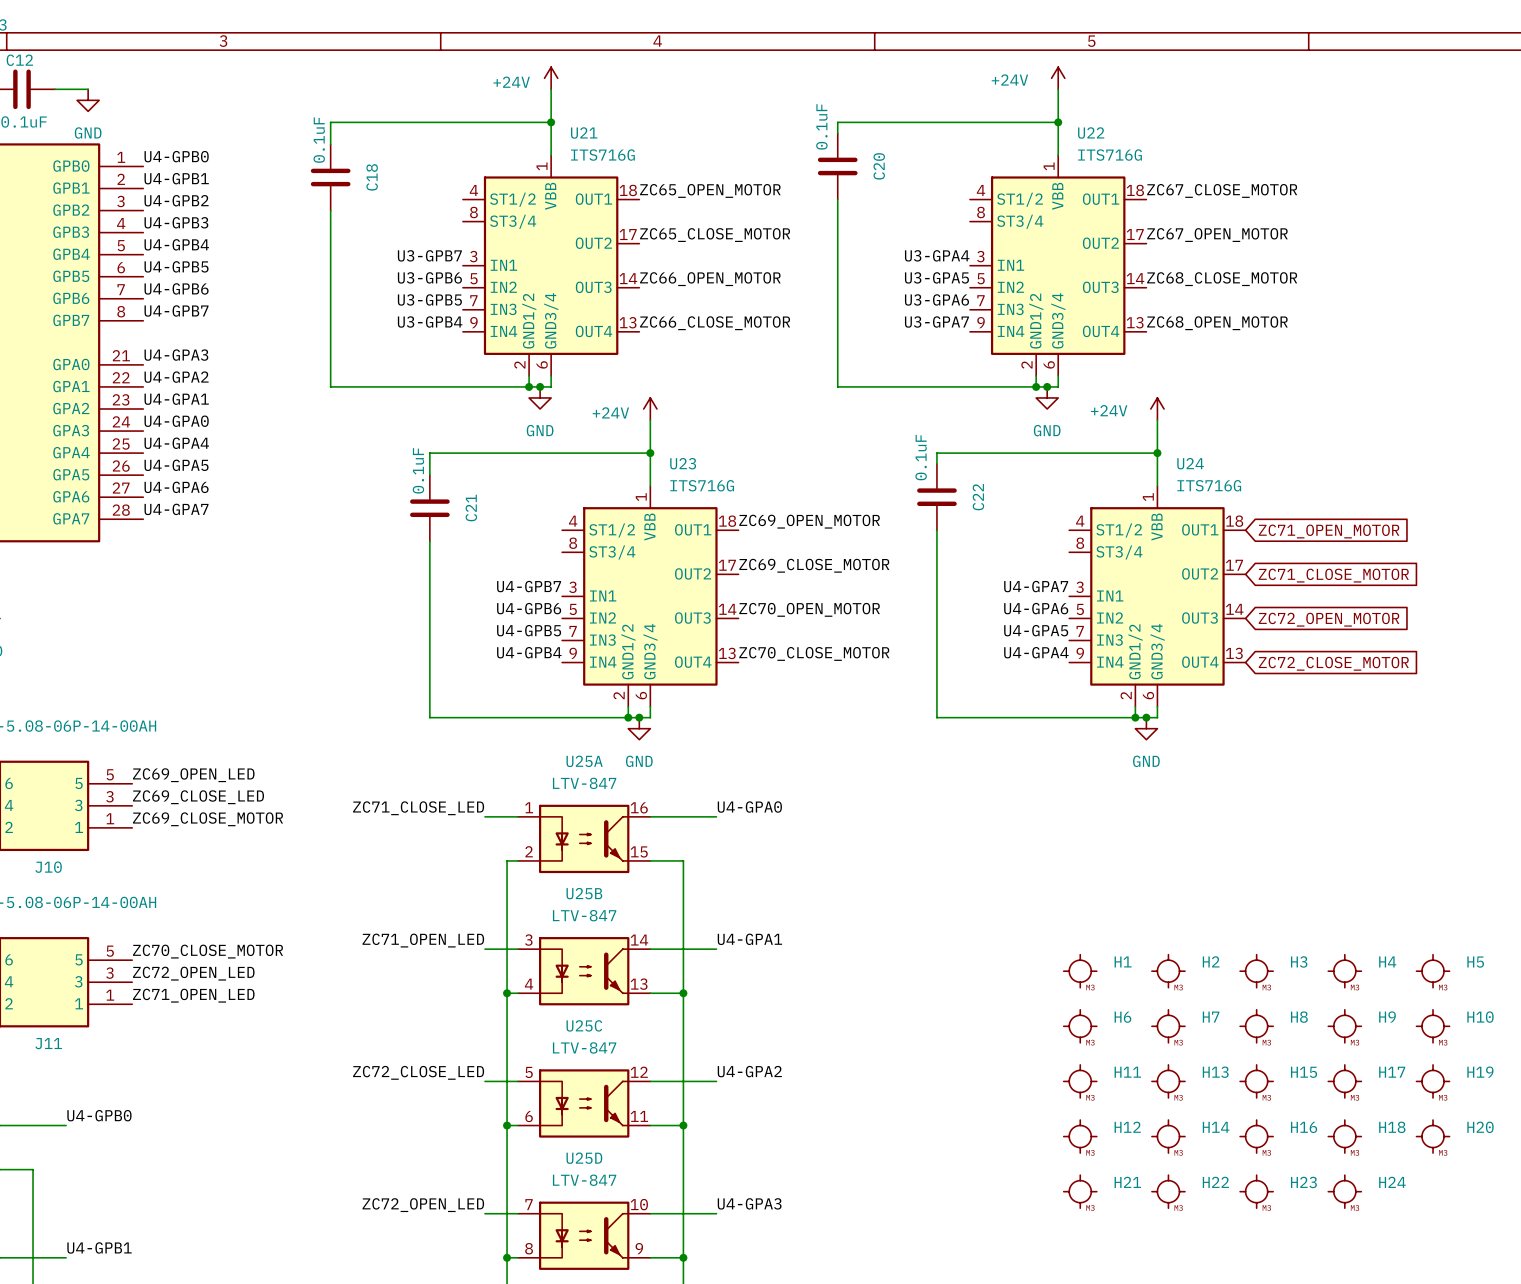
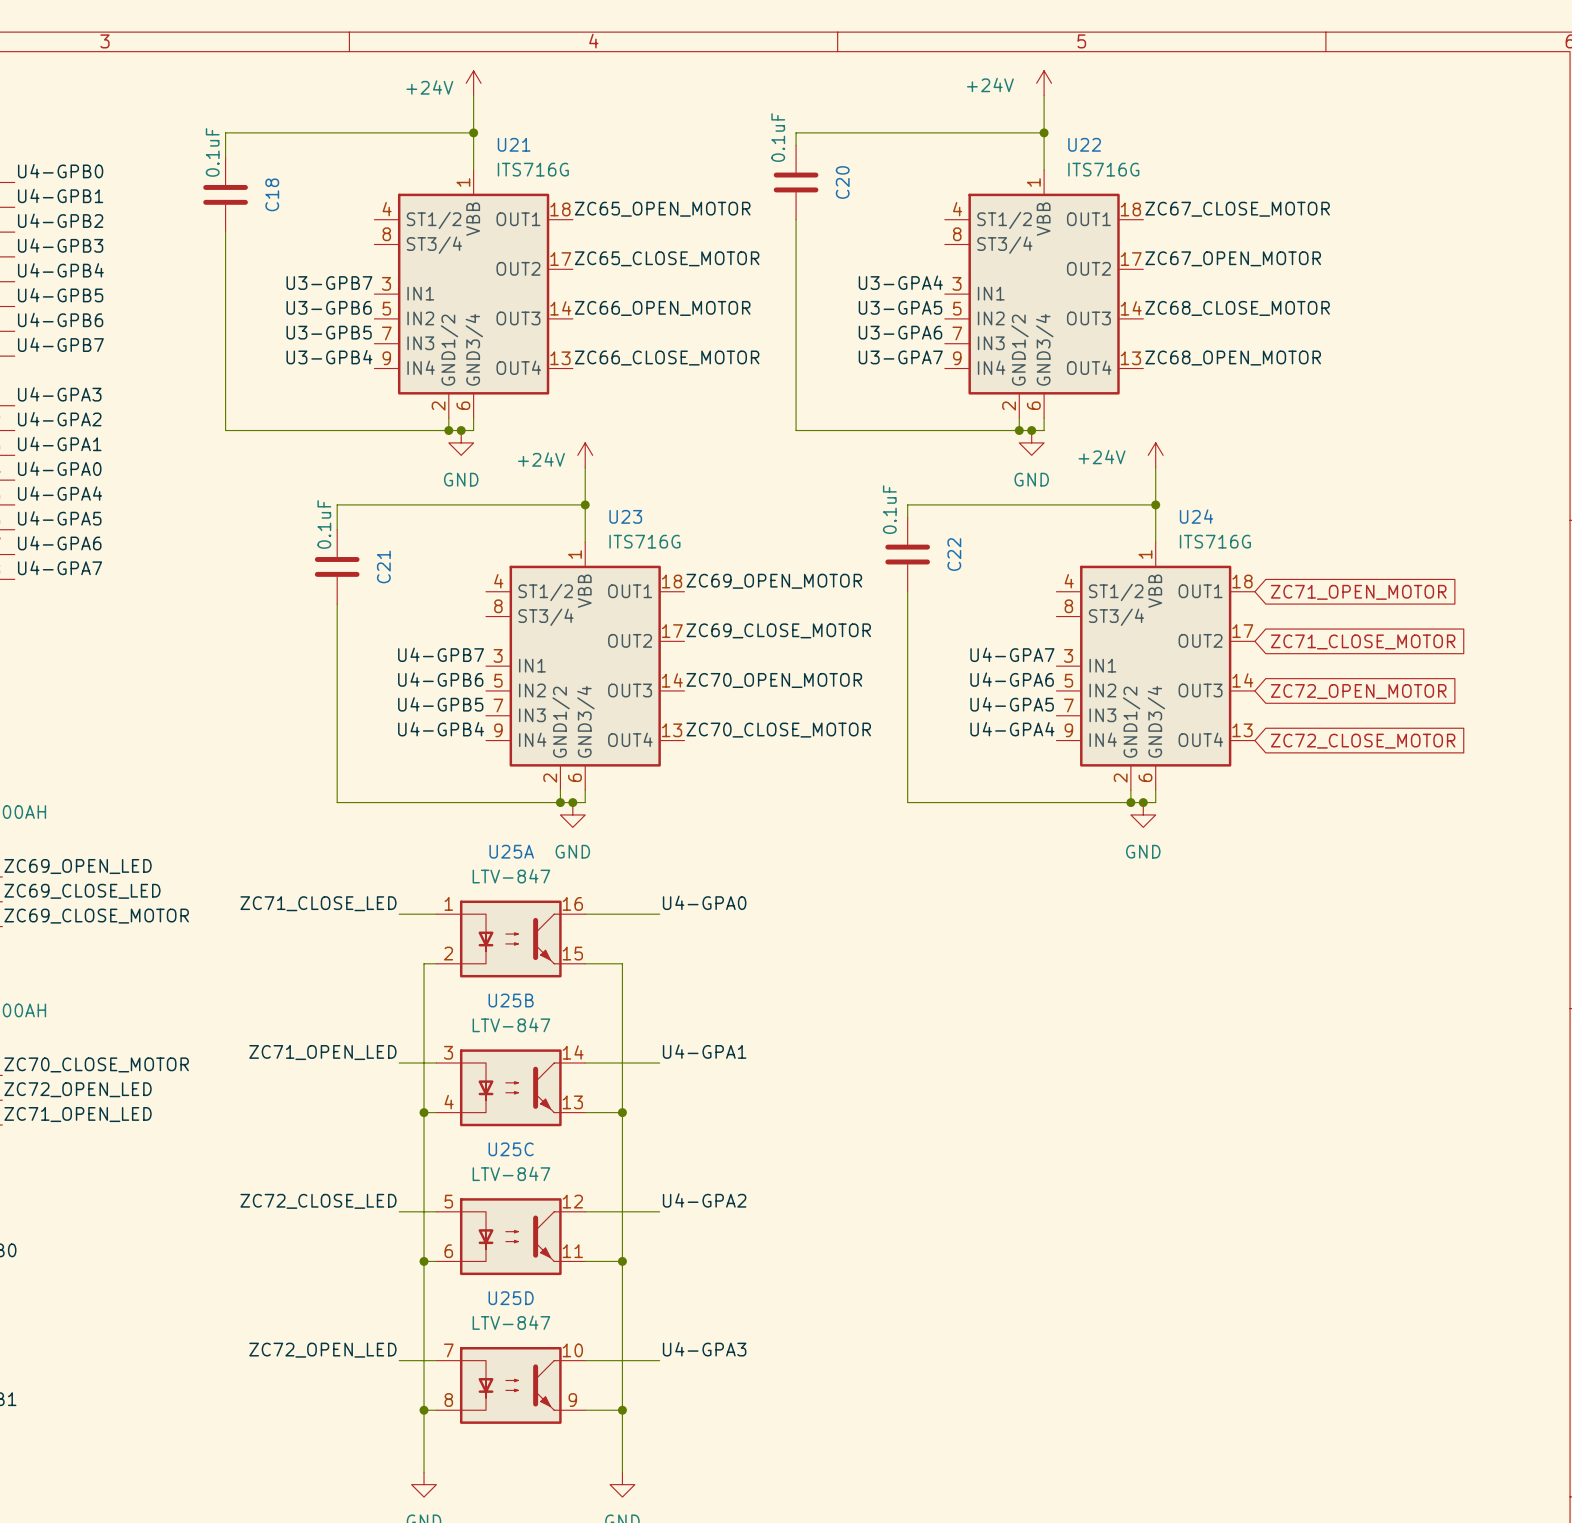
H1: (1080, 971) -> none
H2: (1168, 971) -> none
H3: (1256, 971) -> none
H4: (1344, 971) -> none
H5: (1433, 971) -> none
H6: (1080, 1026) -> none
H7: (1168, 1026) -> none
H8: (1256, 1026) -> none
H9: (1344, 1026) -> none
H10: (1433, 1026) -> none
H11: (1080, 1081) -> none
H13: (1168, 1081) -> none
H15: (1256, 1081) -> none
H17: (1344, 1081) -> none
H19: (1433, 1081) -> none
H12: (1080, 1136) -> none
H14: (1168, 1136) -> none
H16: (1256, 1136) -> none
H18: (1344, 1136) -> none
H20: (1433, 1136) -> none
H21: (1080, 1191) -> none
H22: (1168, 1191) -> none
H23: (1256, 1191) -> none
H24: (1344, 1191) -> none

